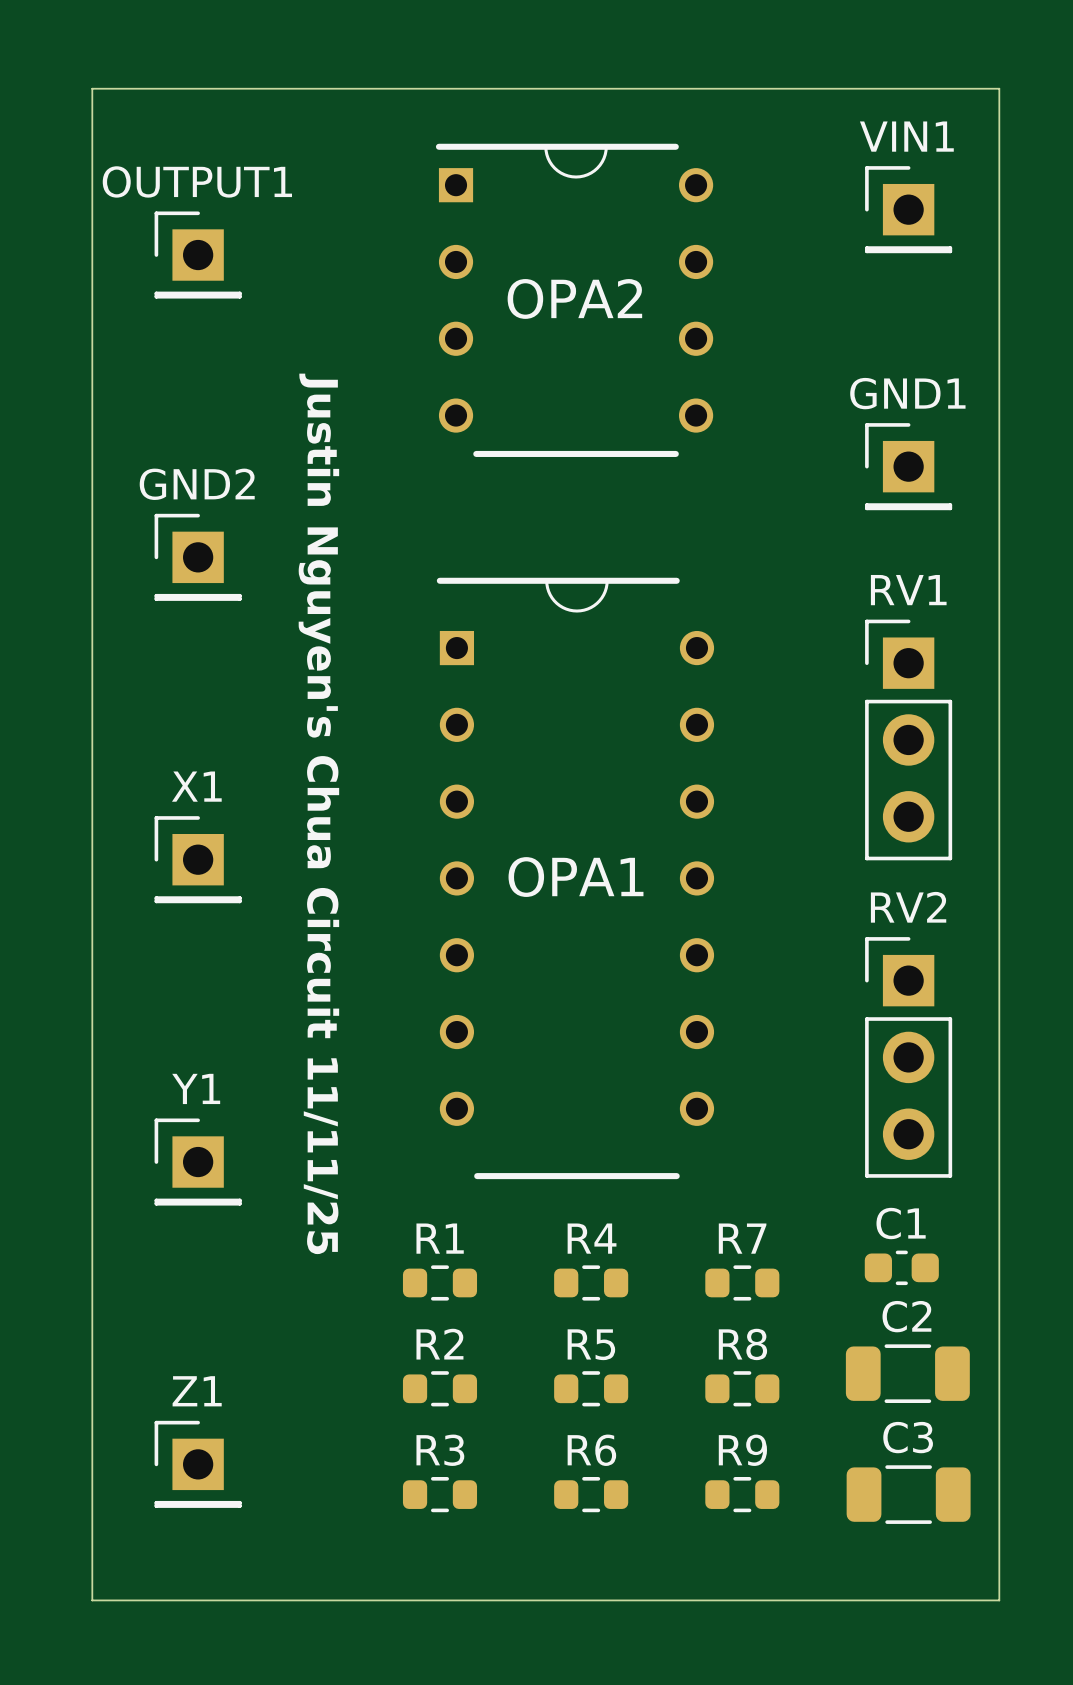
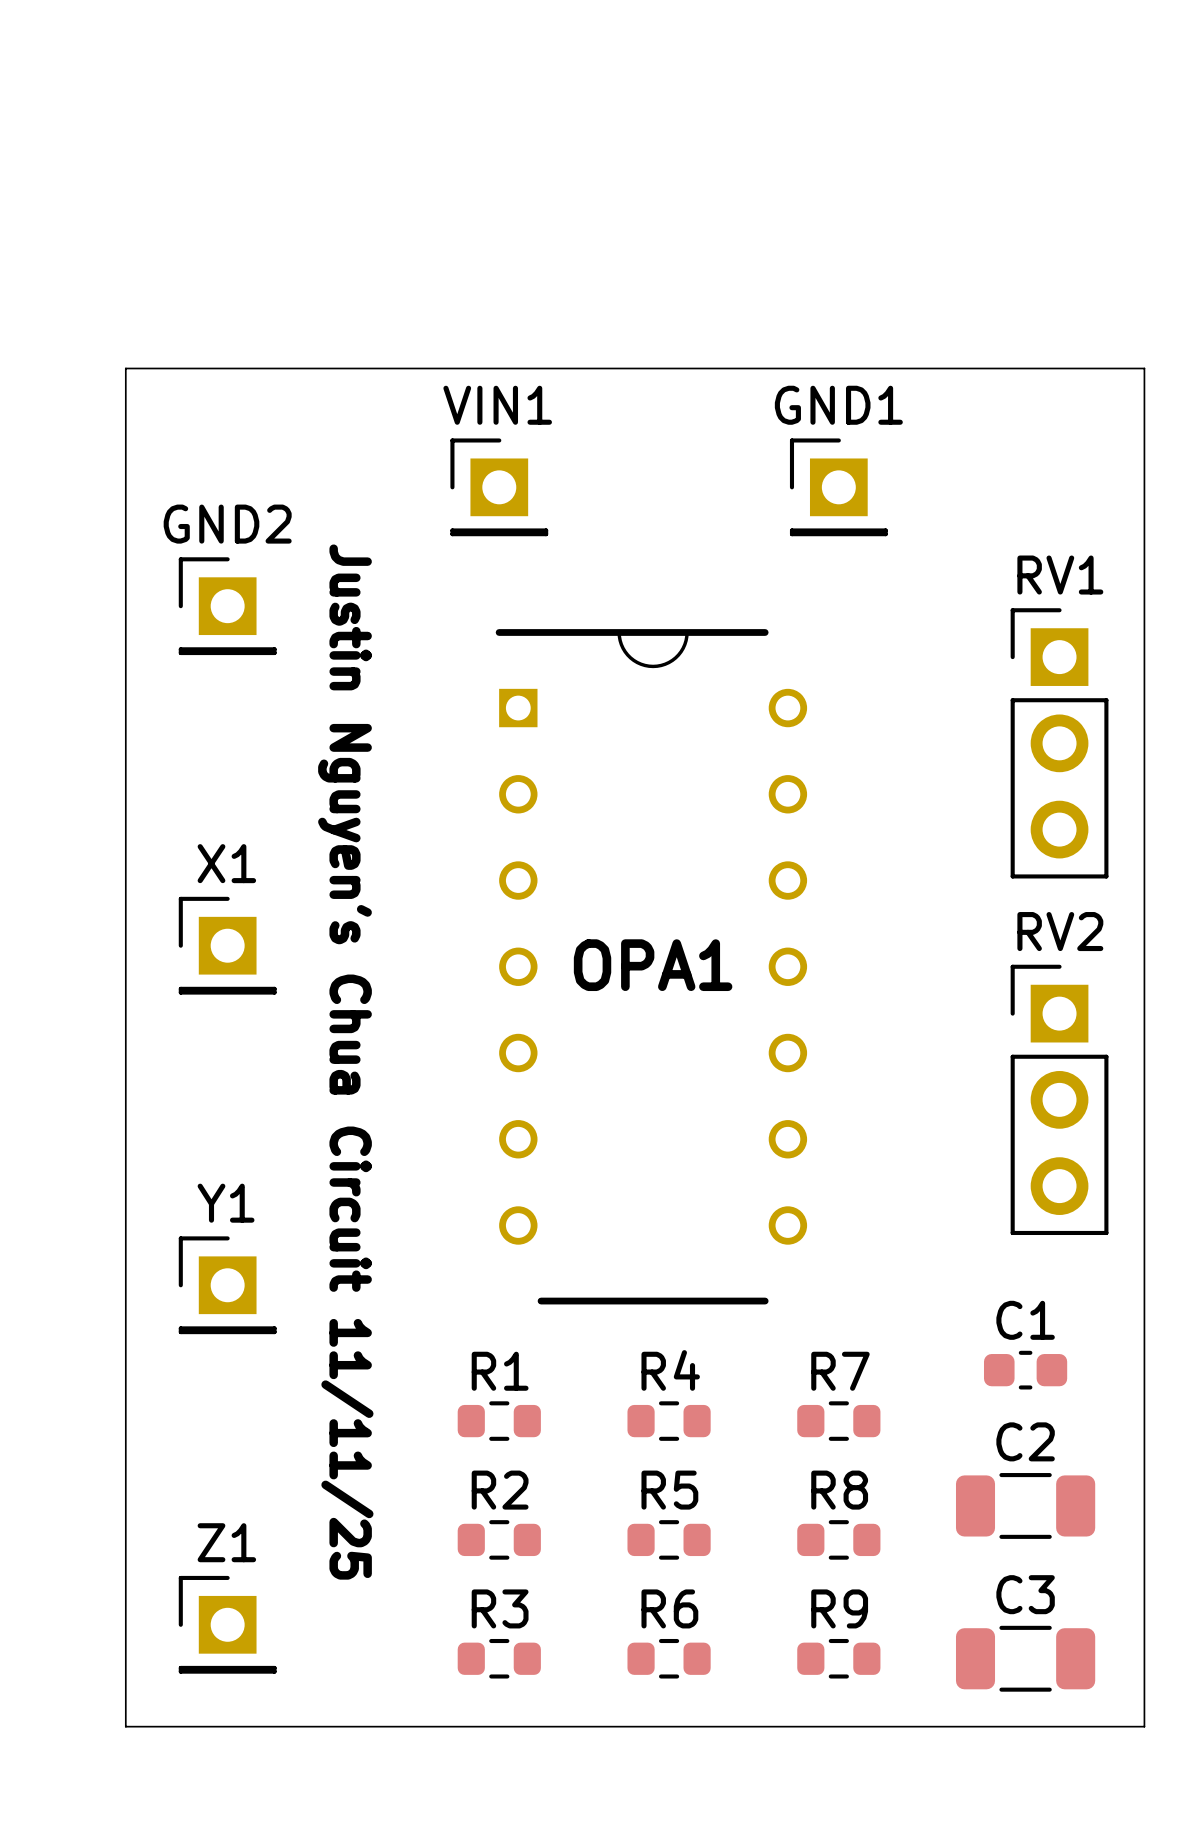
board edge: (92, 88) (999, 88) (999, 1600) (92, 1600) (92, 88) -> (125, 368) (125, 1726) (1144, 1726) (1144, 368) (125, 368)
VIN1 position: (908, 209) -> (499, 487)
OUTPUT1: (198, 255) -> none
OPA2: (574, 300) -> none
GND1 position: (908, 466) -> (838, 487)
RV1 position: (908, 739) -> (1059, 743)
text position: Justin Nguyen's Chua Circuit 11/11/25 (318, 813) -> Justin Nguyen's Chua Circuit 11/11/25 (345, 1062)
RV2 position: (908, 1057) -> (1059, 1099)
C1 position: (901, 1267) -> (1025, 1370)
C2 position: (907, 1373) -> (1025, 1505)

